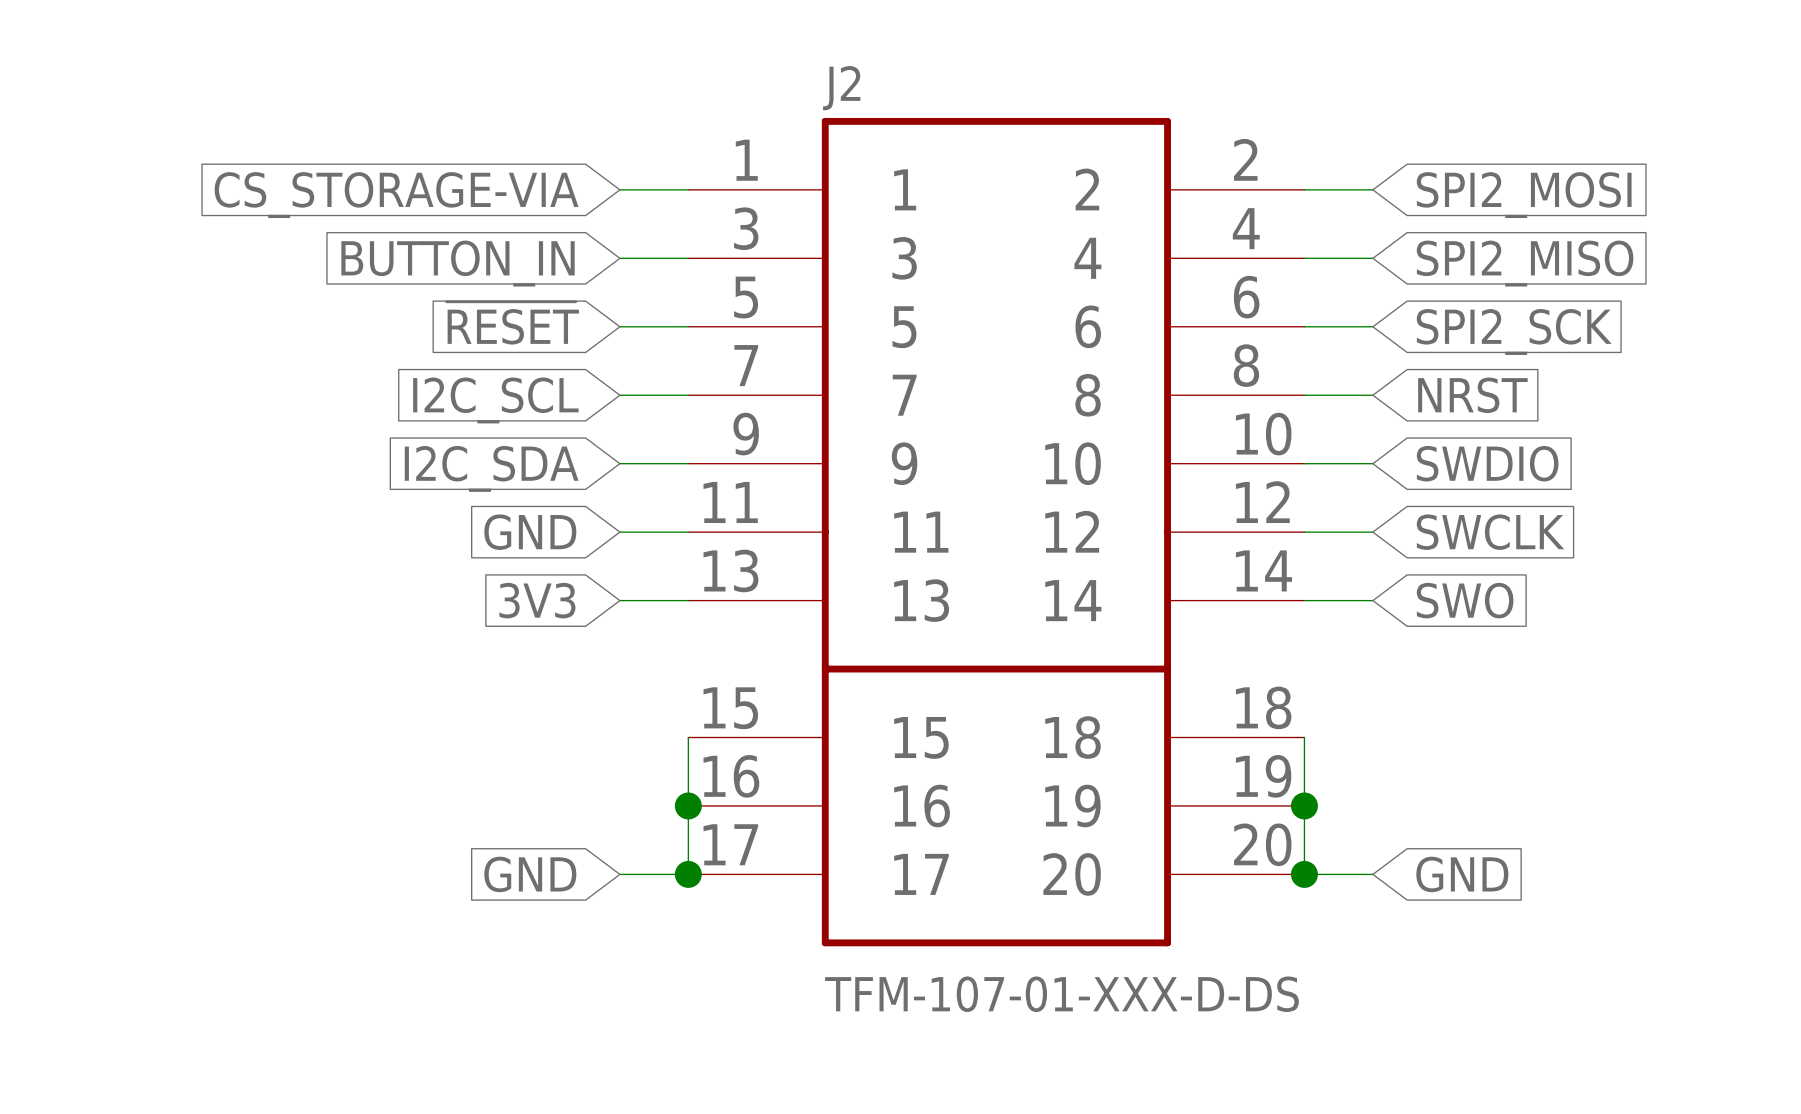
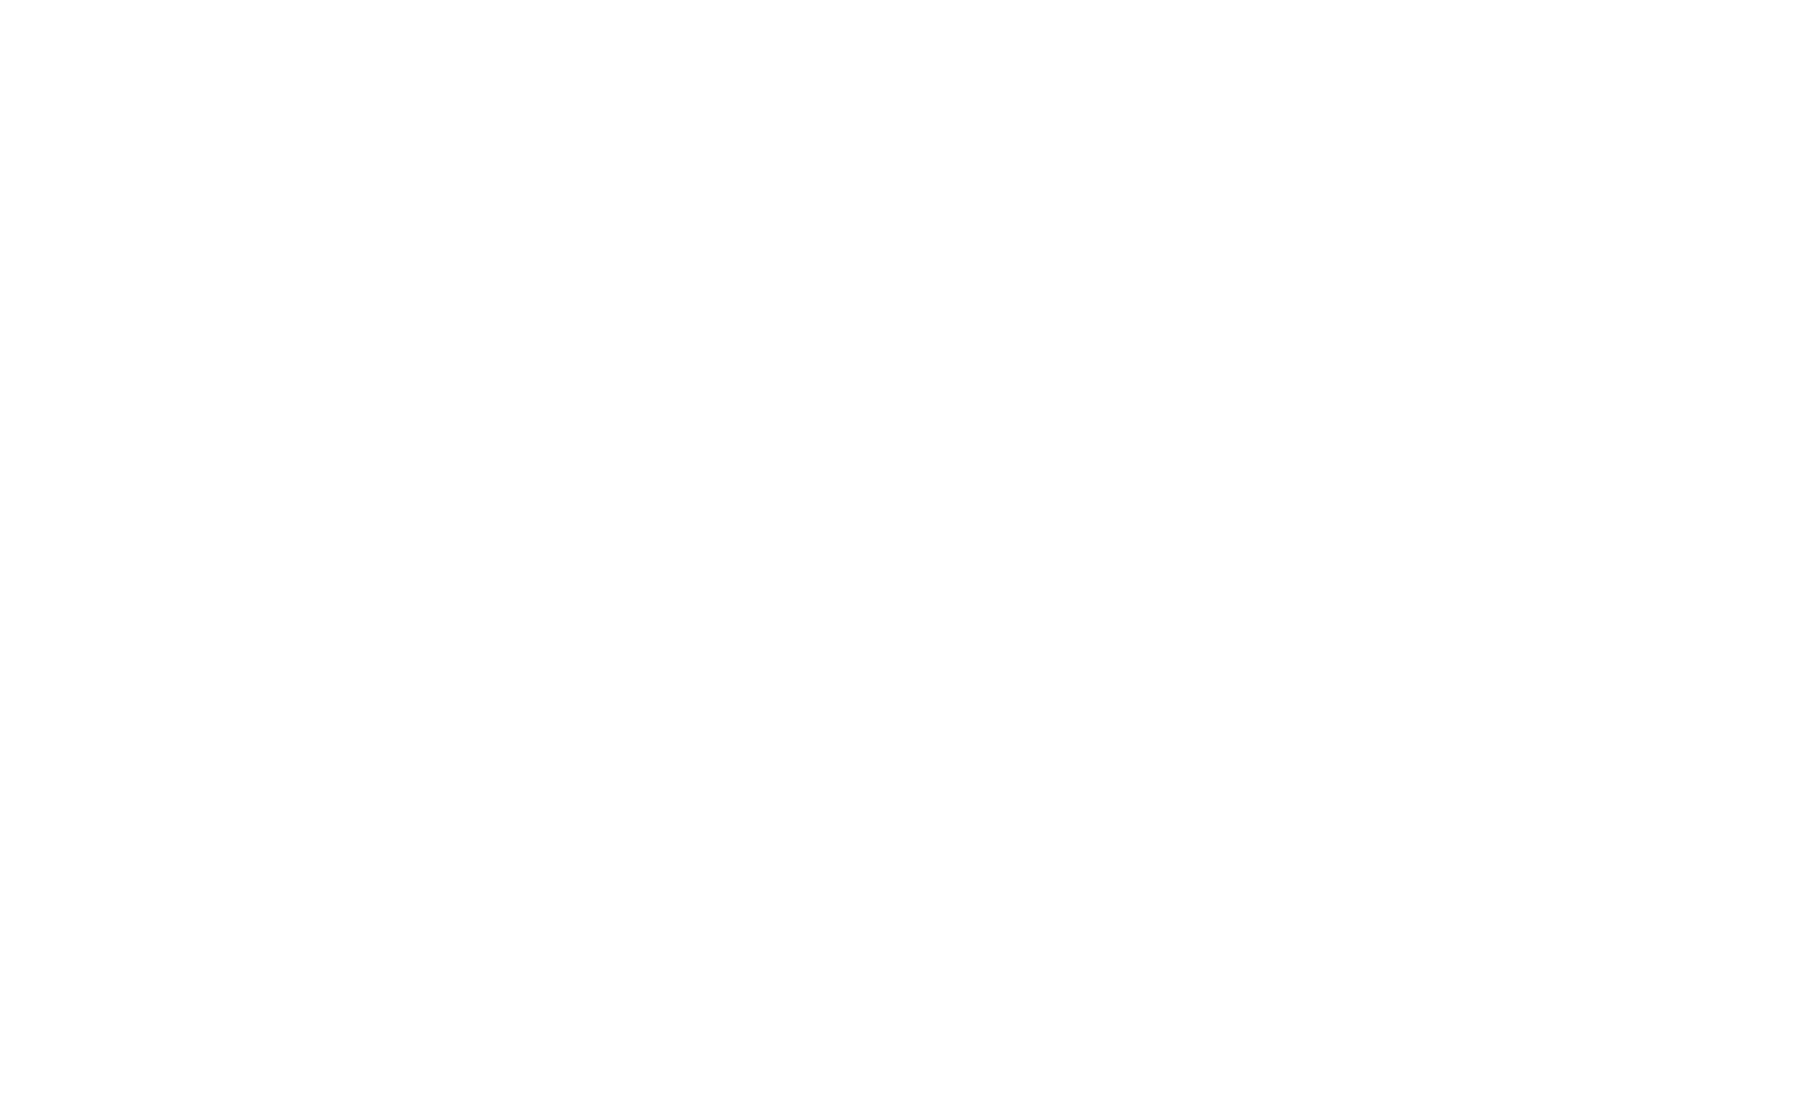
wire: (619, 189) (688, 189) -> none
wire: (1304, 189) (1372, 189) -> none
global label: CS_STORAGE-VIA (396, 195) -> none
global label: SPI2_MOSI (1524, 195) -> none
wire: (619, 258) (688, 258) -> none
wire: (1304, 258) (1372, 258) -> none
global label: BUTTON_IN (458, 263) -> none
global label: SPI2_MISO (1525, 263) -> none
global label: ~{RESET} (512, 323) -> none
wire: (619, 326) (688, 326) -> none
wire: (1304, 326) (1372, 326) -> none
global label: SPI2_SCK (1514, 332) -> none
wire: (619, 395) (688, 395) -> none
wire: (1304, 395) (1372, 395) -> none
global label: NRST (1472, 395) -> none
global label: I2C_SCL (495, 400) -> none
wire: (619, 463) (688, 463) -> none
wire: (1304, 463) (1372, 463) -> none
global label: SWDIO (1487, 463) -> none
global label: I2C_SDA (491, 468) -> none
global label: GND (530, 532) -> none
wire: (619, 532) (688, 532) -> none
J2: TFM-107-01-XXX-D-DS (996, 532) -> none
wire: (1304, 532) (1372, 532) -> none
global label: SWCLK (1490, 532) -> none
global label: 3V3 (537, 600) -> none
wire: (619, 600) (688, 600) -> none
wire: (1304, 600) (1372, 600) -> none
global label: SWO (1465, 600) -> none
wire: (688, 737) (688, 874) (619, 874) -> none
wire: (1304, 737) (1304, 874) (1372, 874) -> none
junction: (688, 805) -> none
junction: (1304, 805) -> none
global label: GND (530, 874) -> none
junction: (688, 874) -> none
junction: (1304, 874) -> none
global label: GND (1462, 874) -> none

